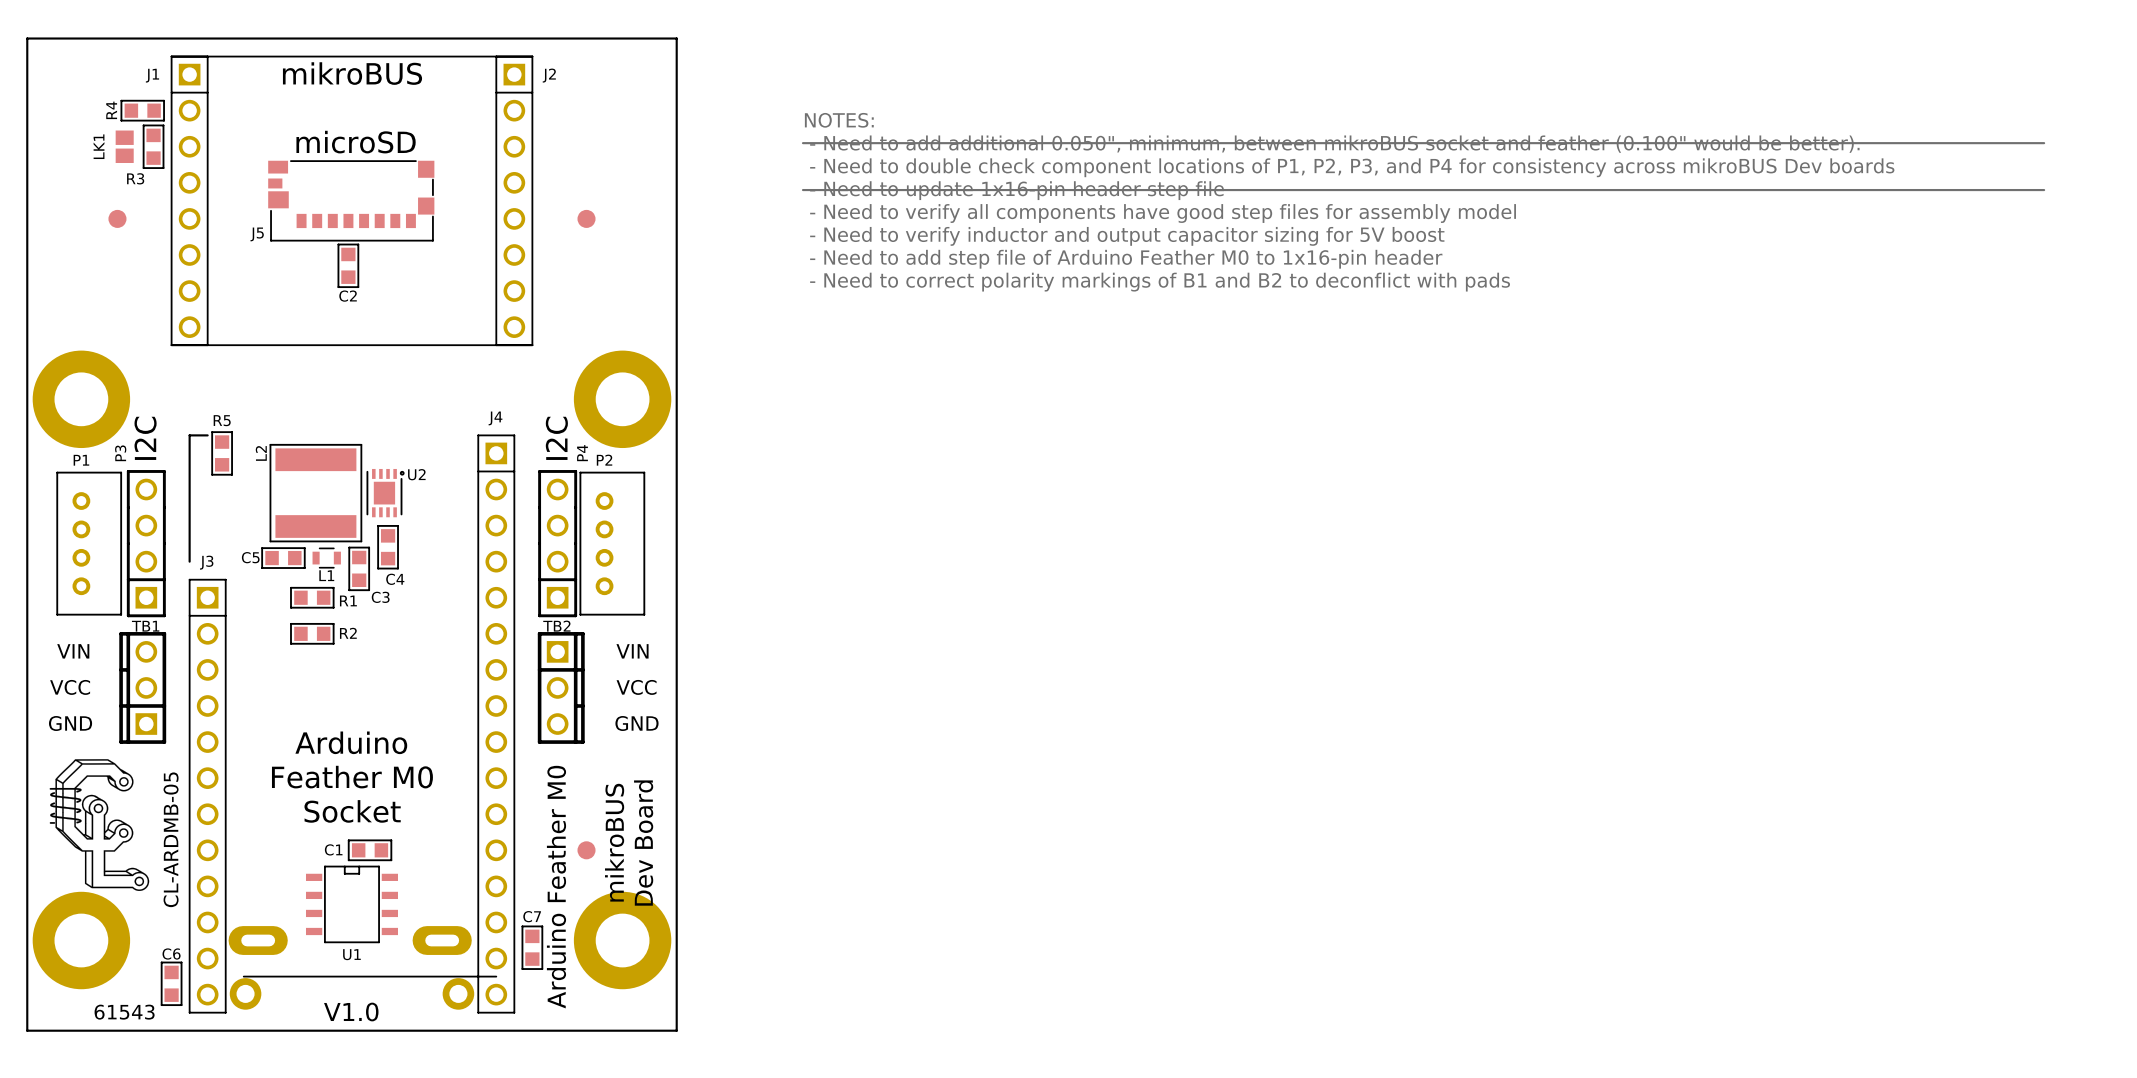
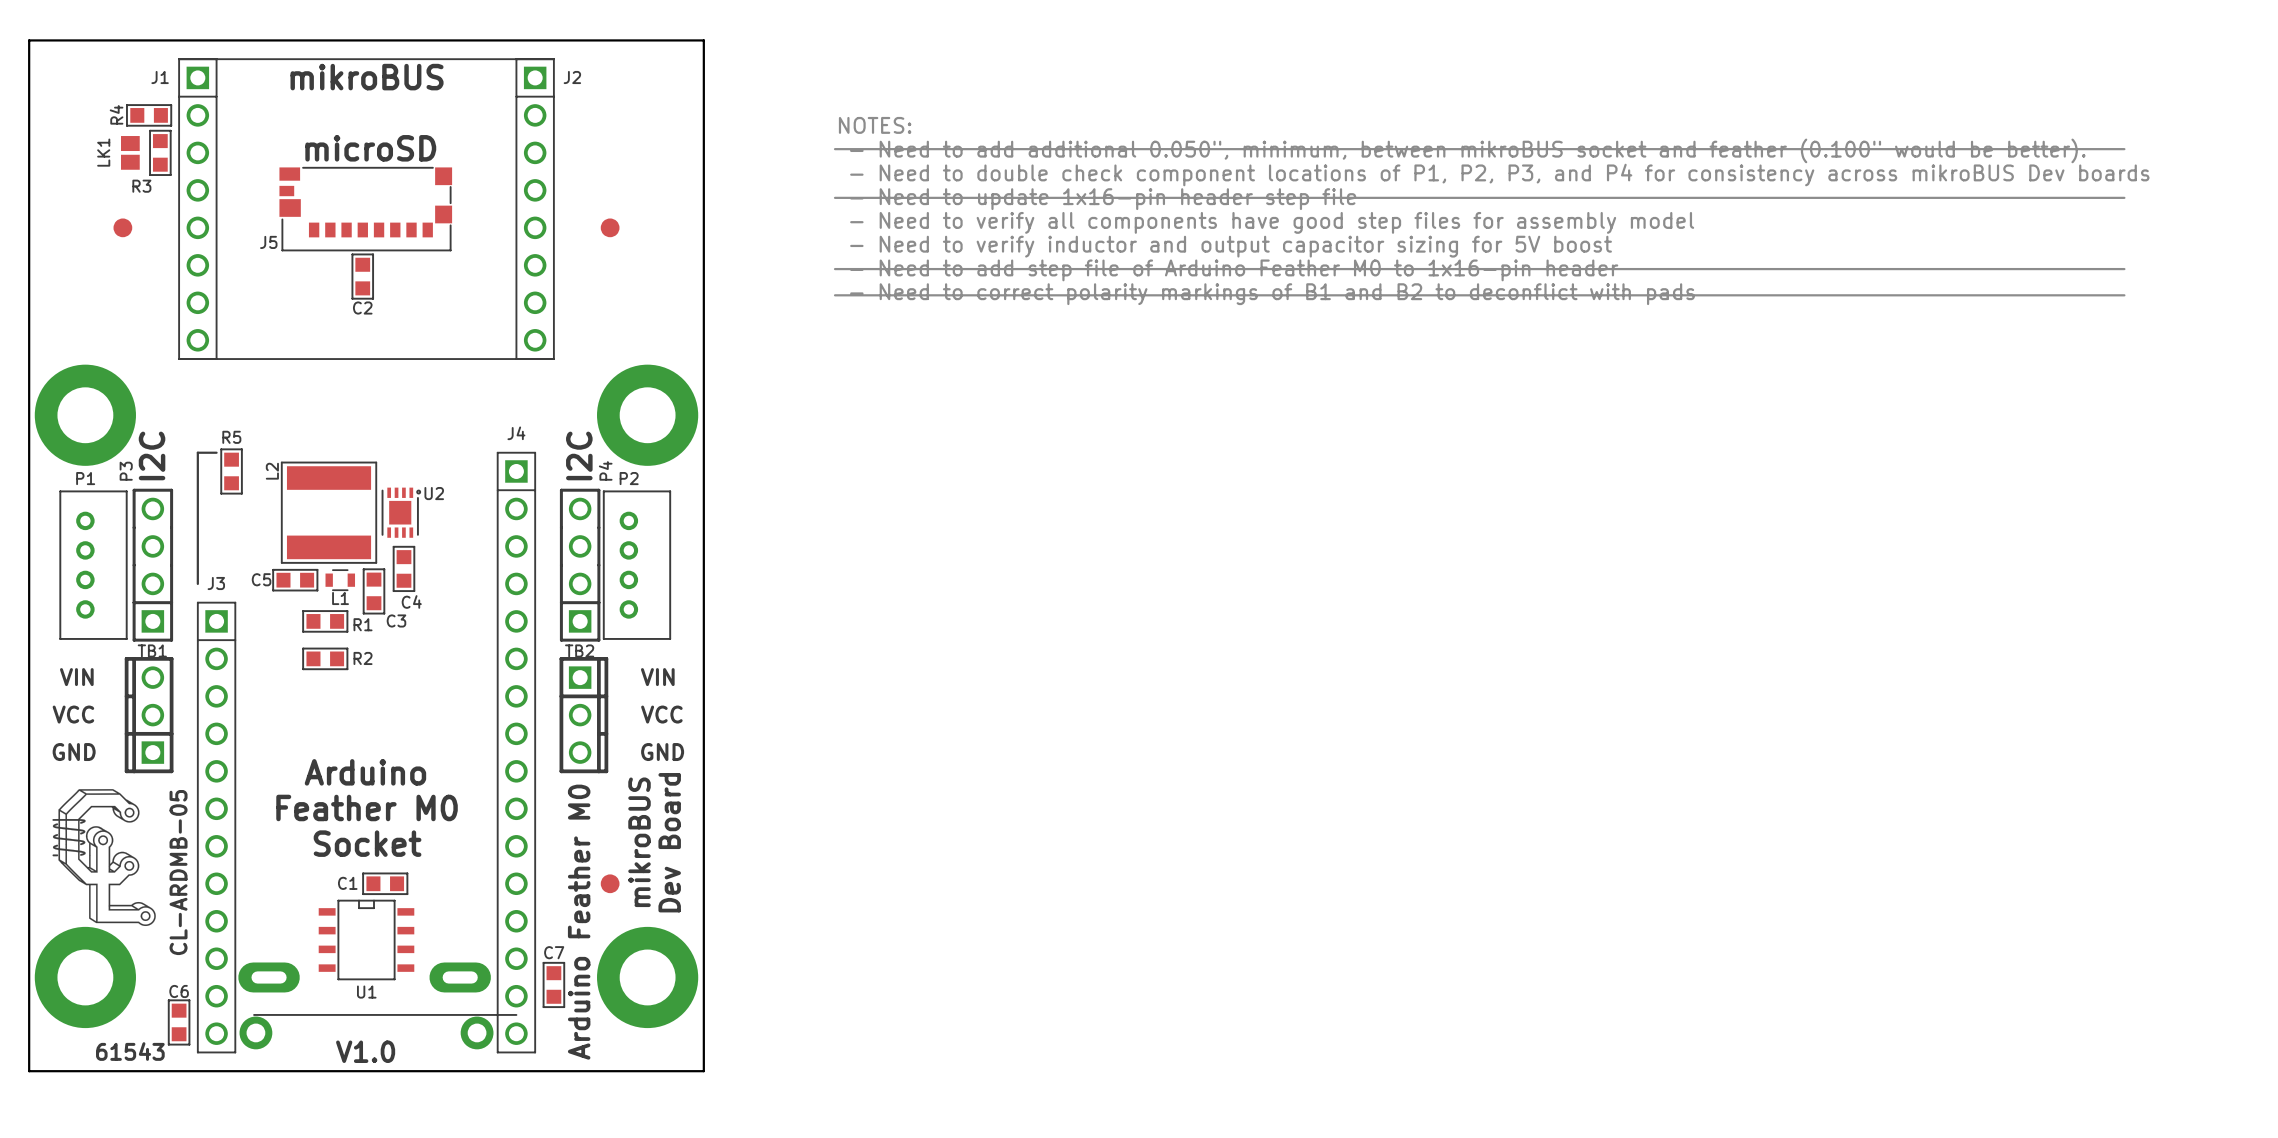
line: none -> (835, 269) (2124, 269)
line: none -> (835, 295) (2124, 295)

